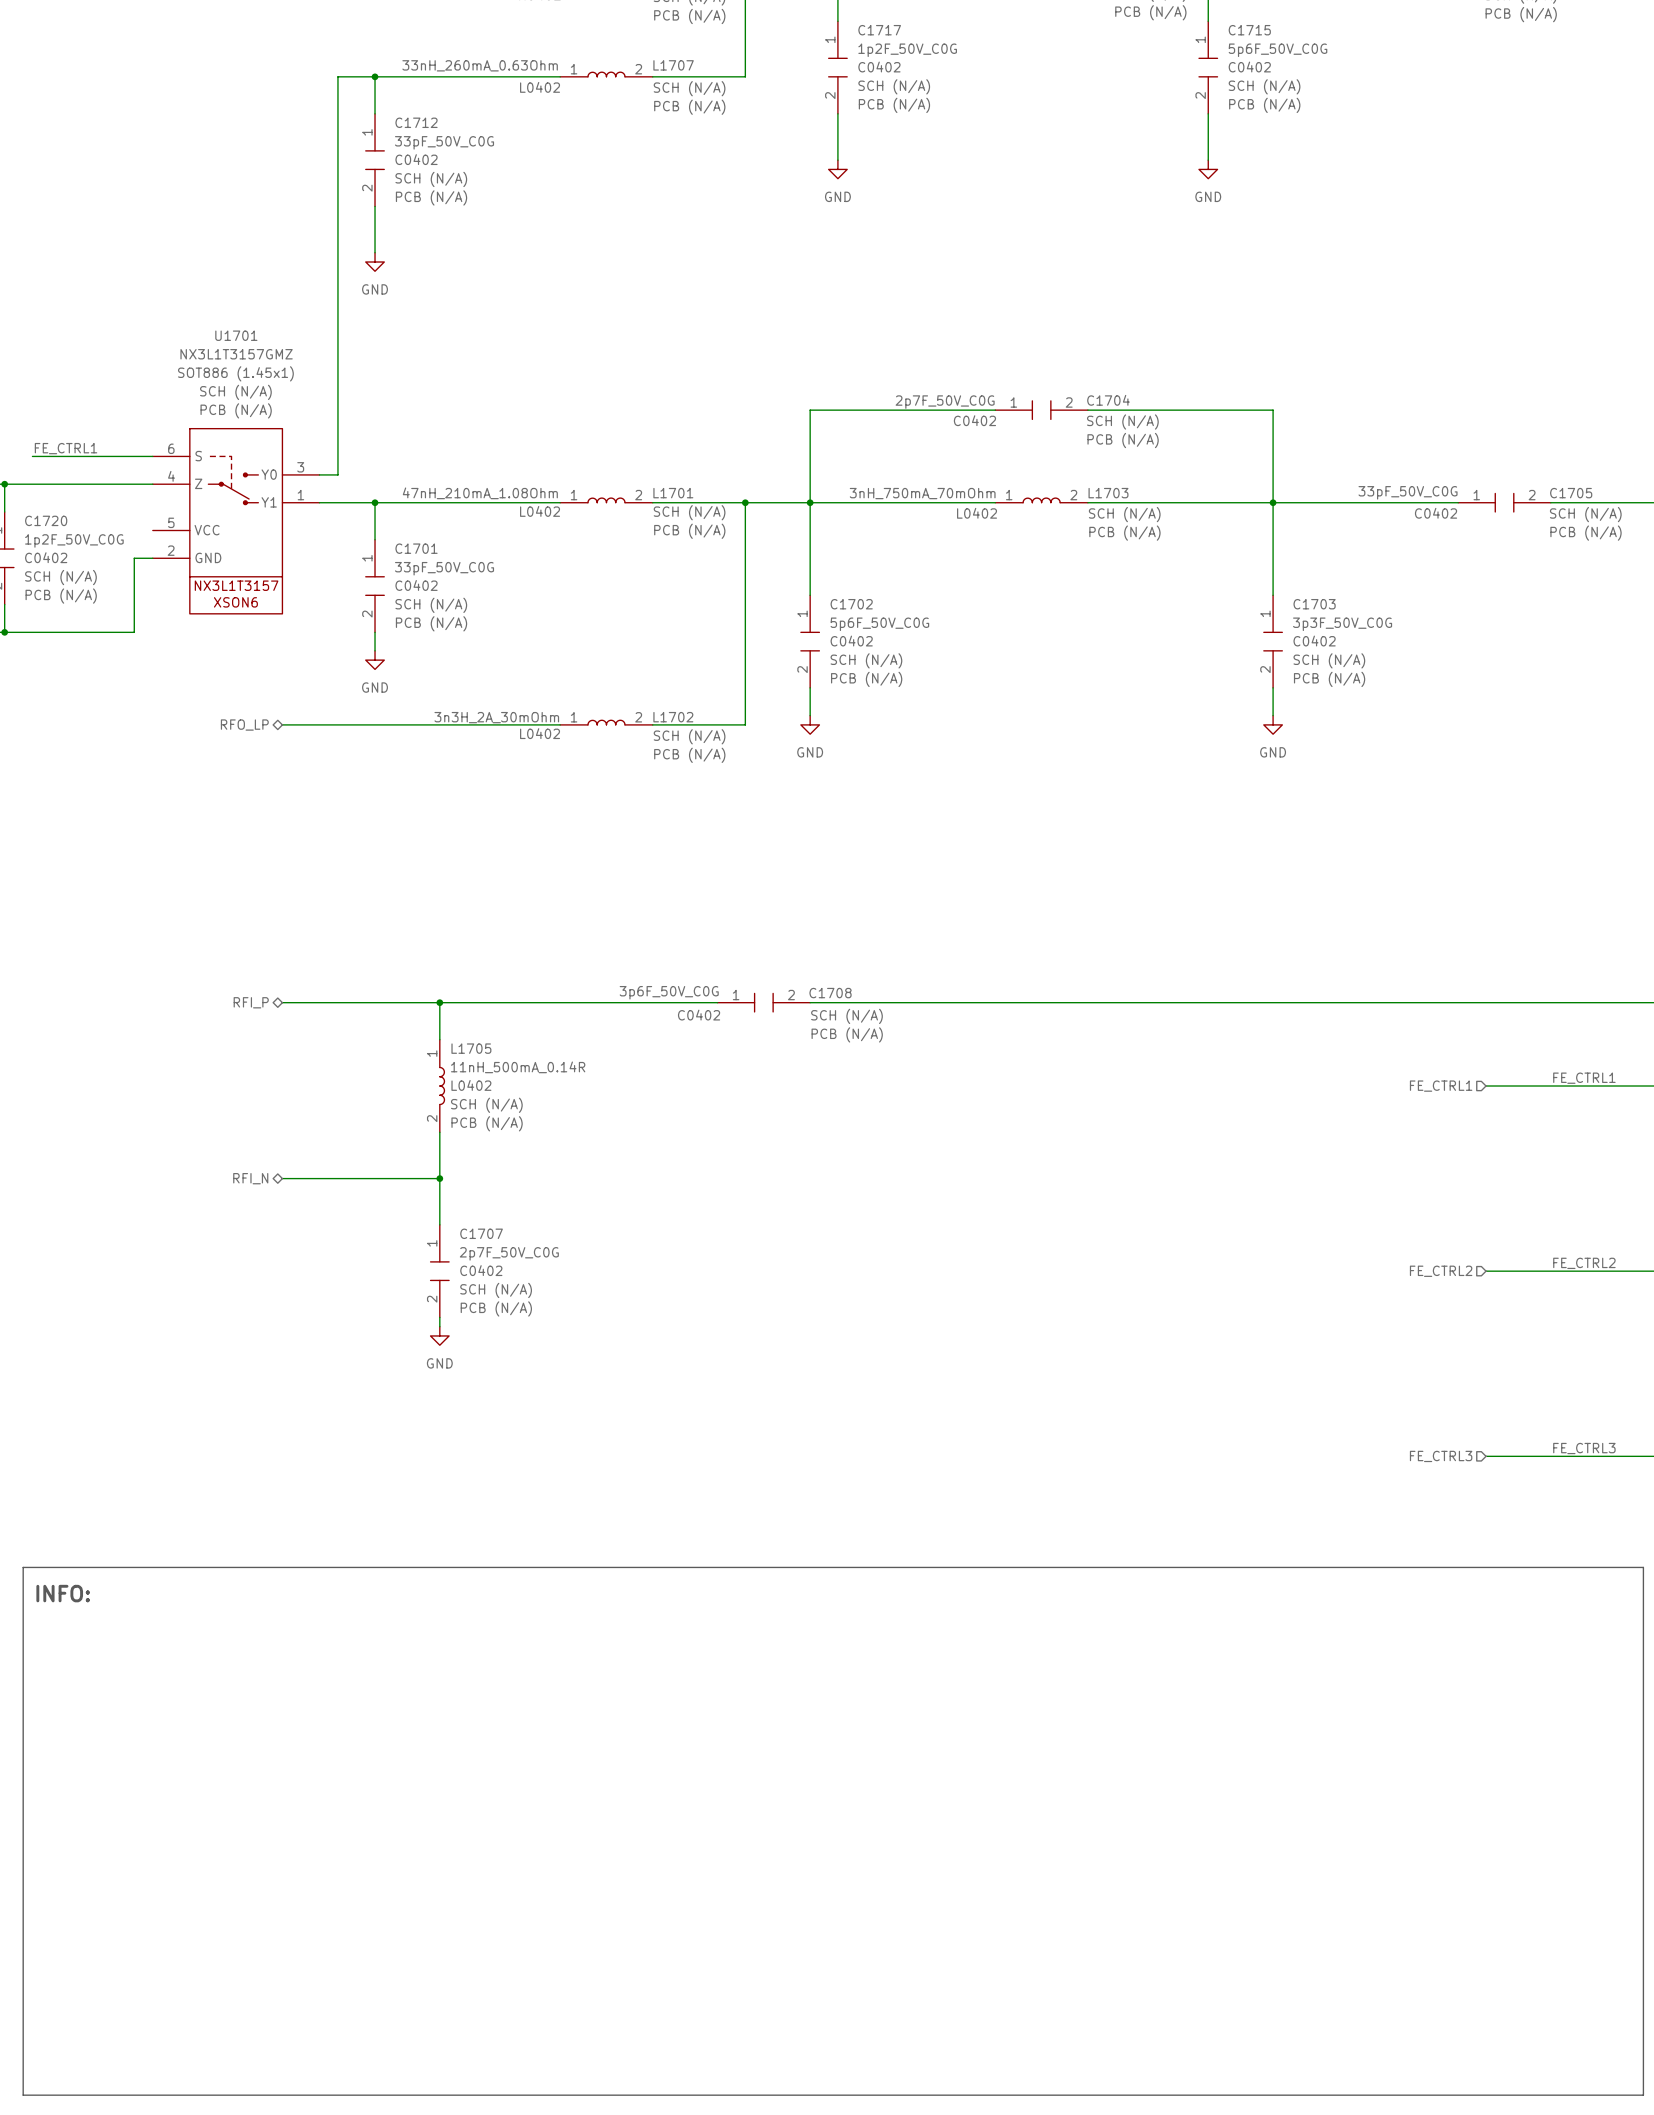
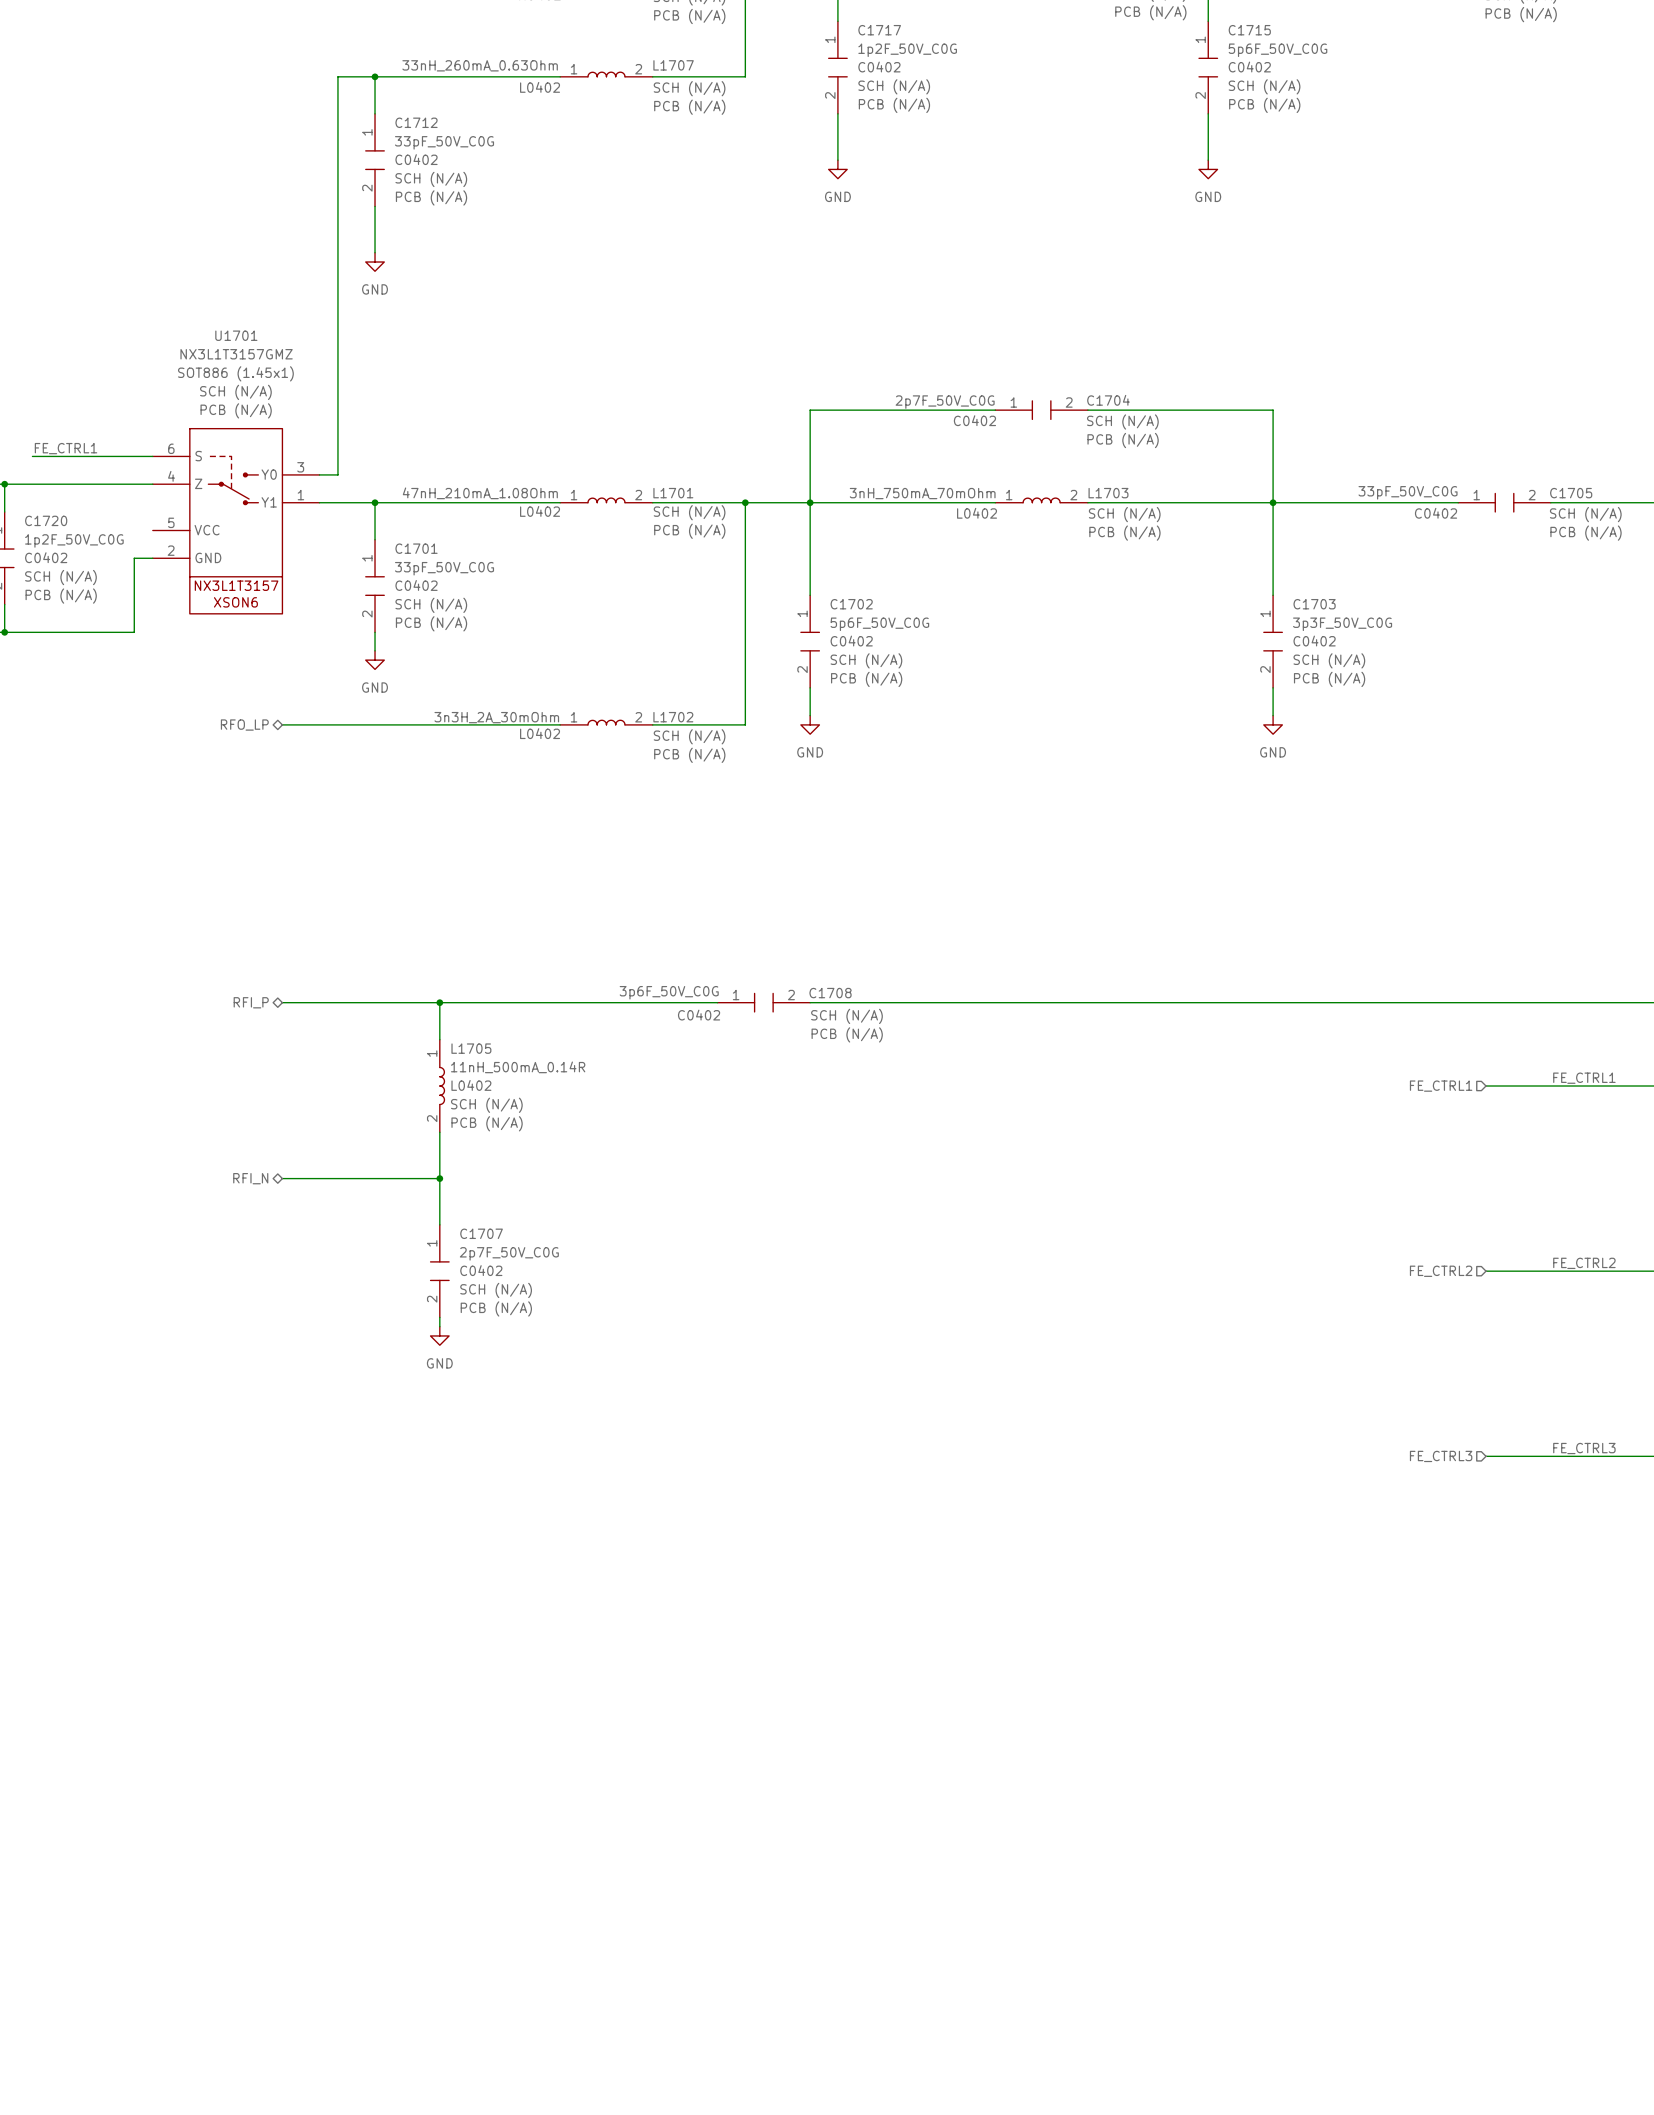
line: (23, 1567) (23, 2095) (1643, 2095) (1643, 1567) (23, 1567) -> none
text: INFO: (63, 1593) -> none

